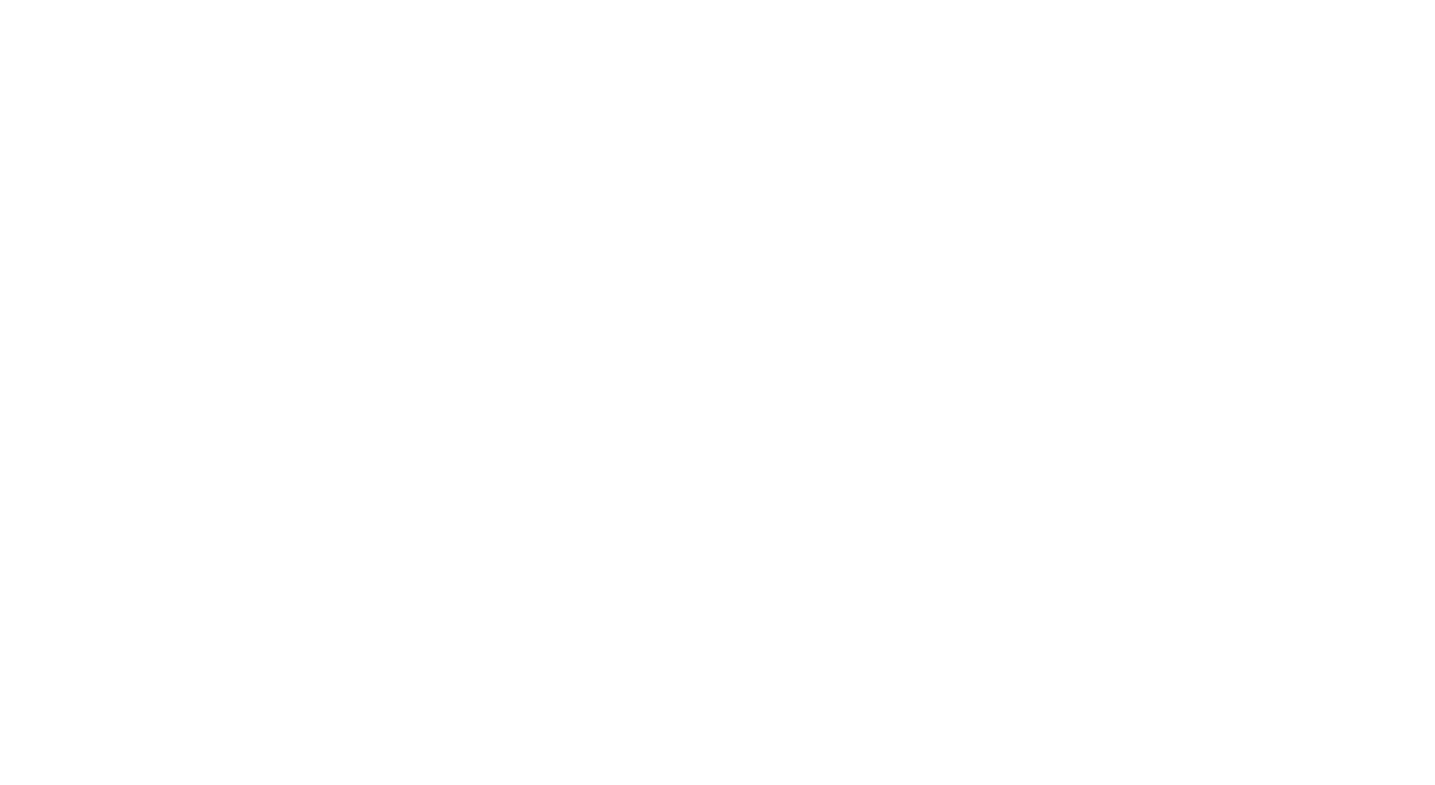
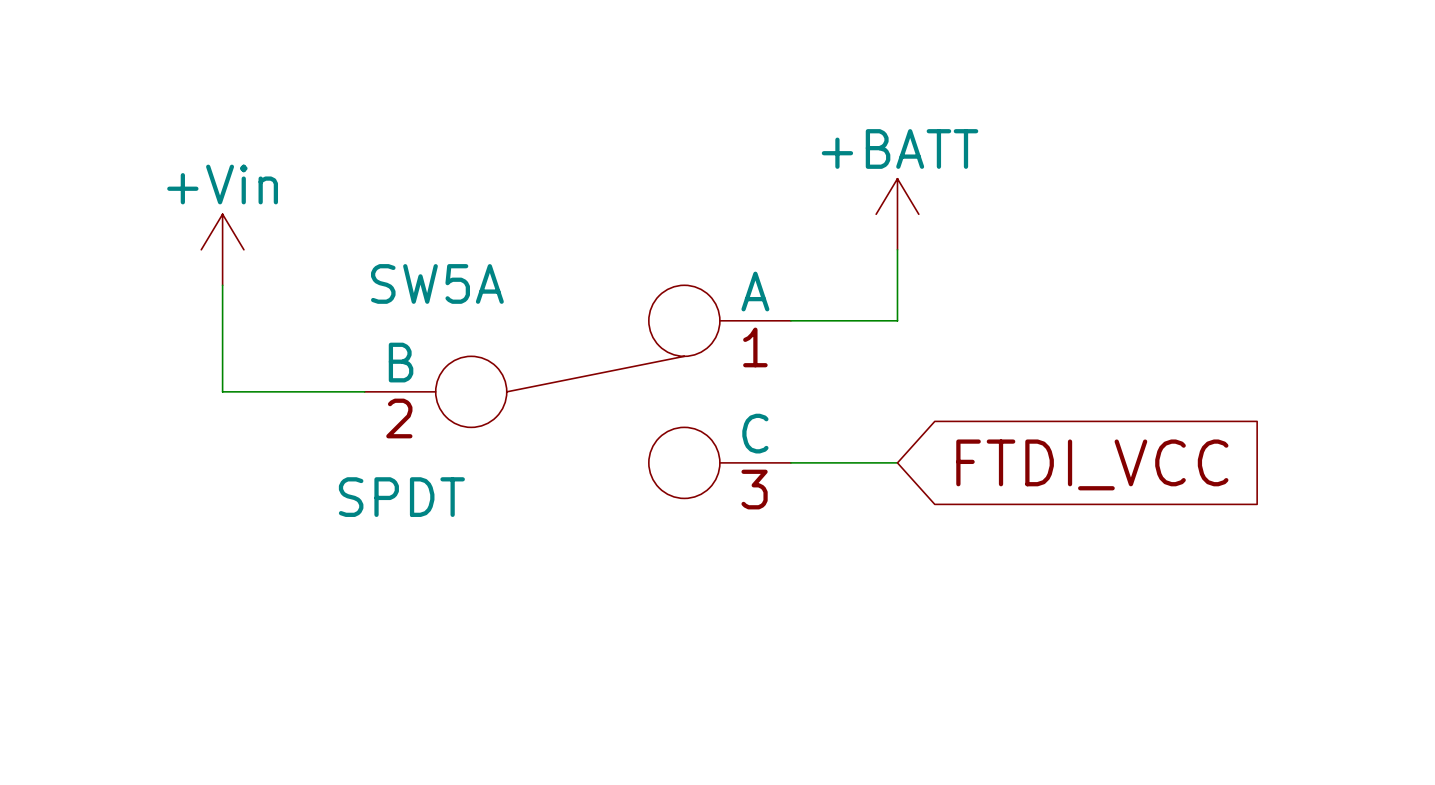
power symbol: none -> +BATT (897, 214)
power symbol: none -> +Vin (222, 249)
wire: none -> (897, 249) (897, 320) (790, 320)
wire: none -> (222, 285) (222, 391) (364, 391)
SW5A: none -> SPDT (577, 391)
wire: none -> (790, 462) (897, 462)
global label: none -> FTDI_VCC (1092, 464)

